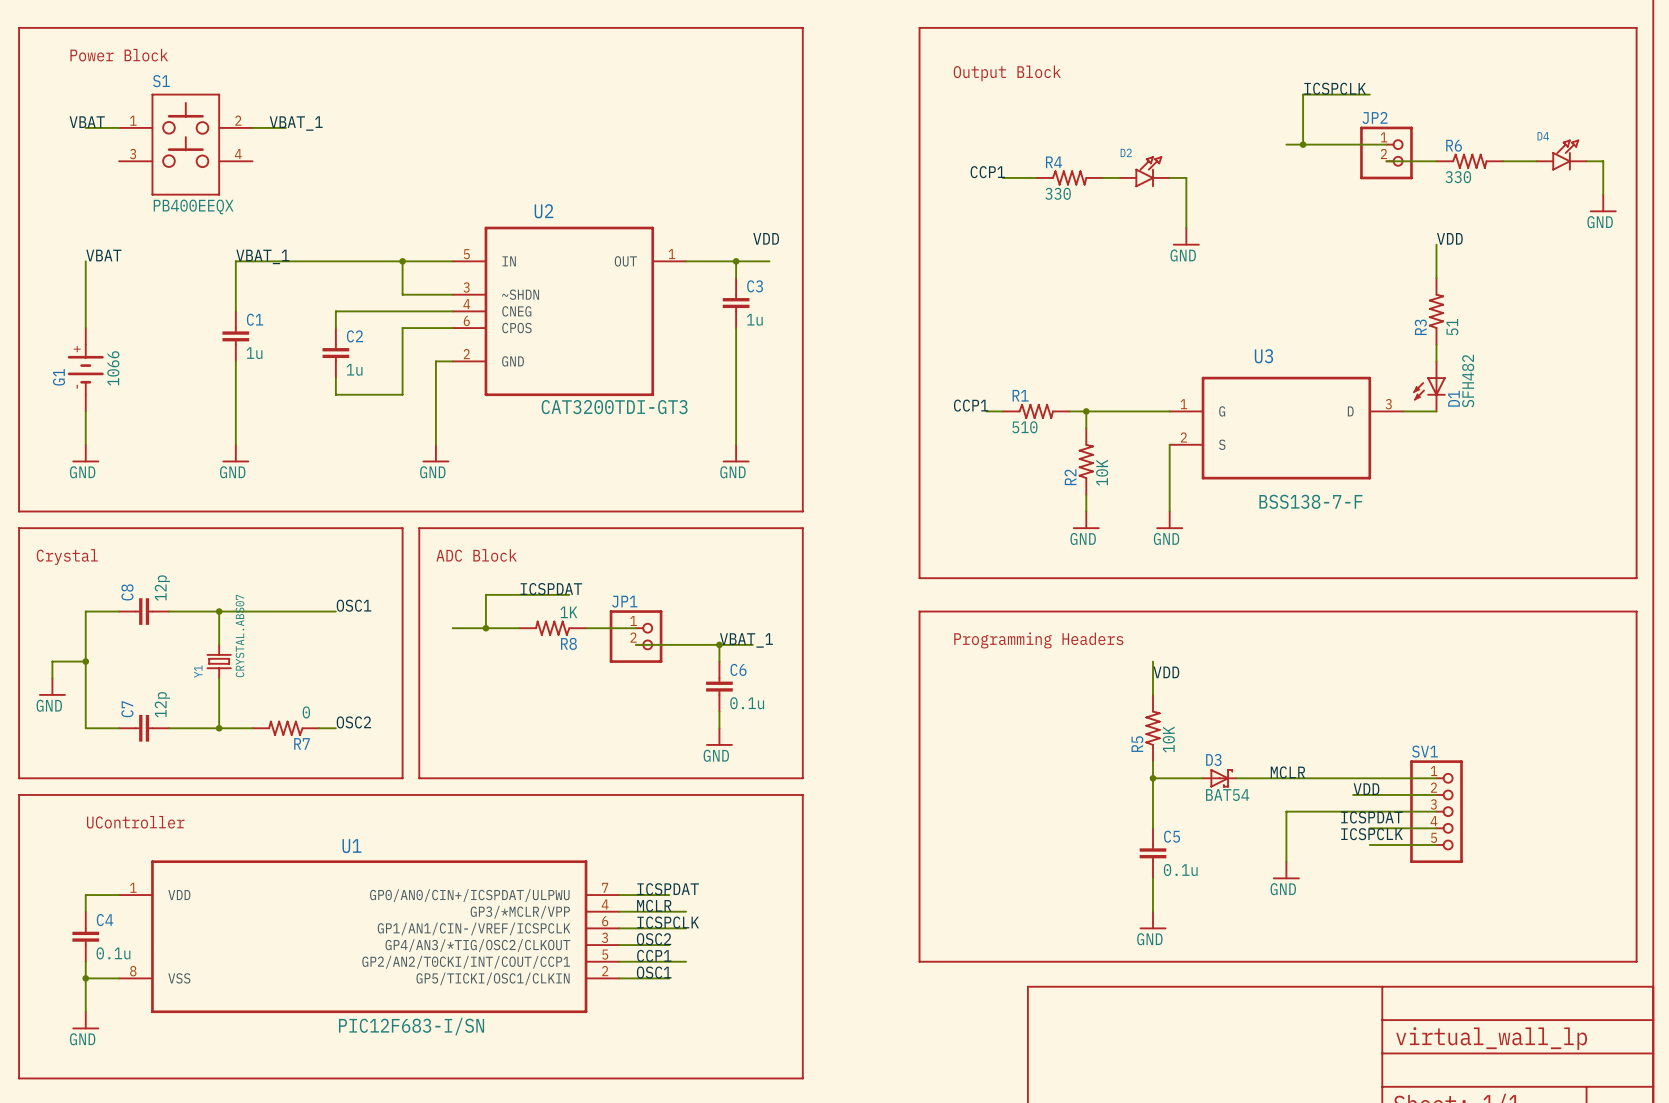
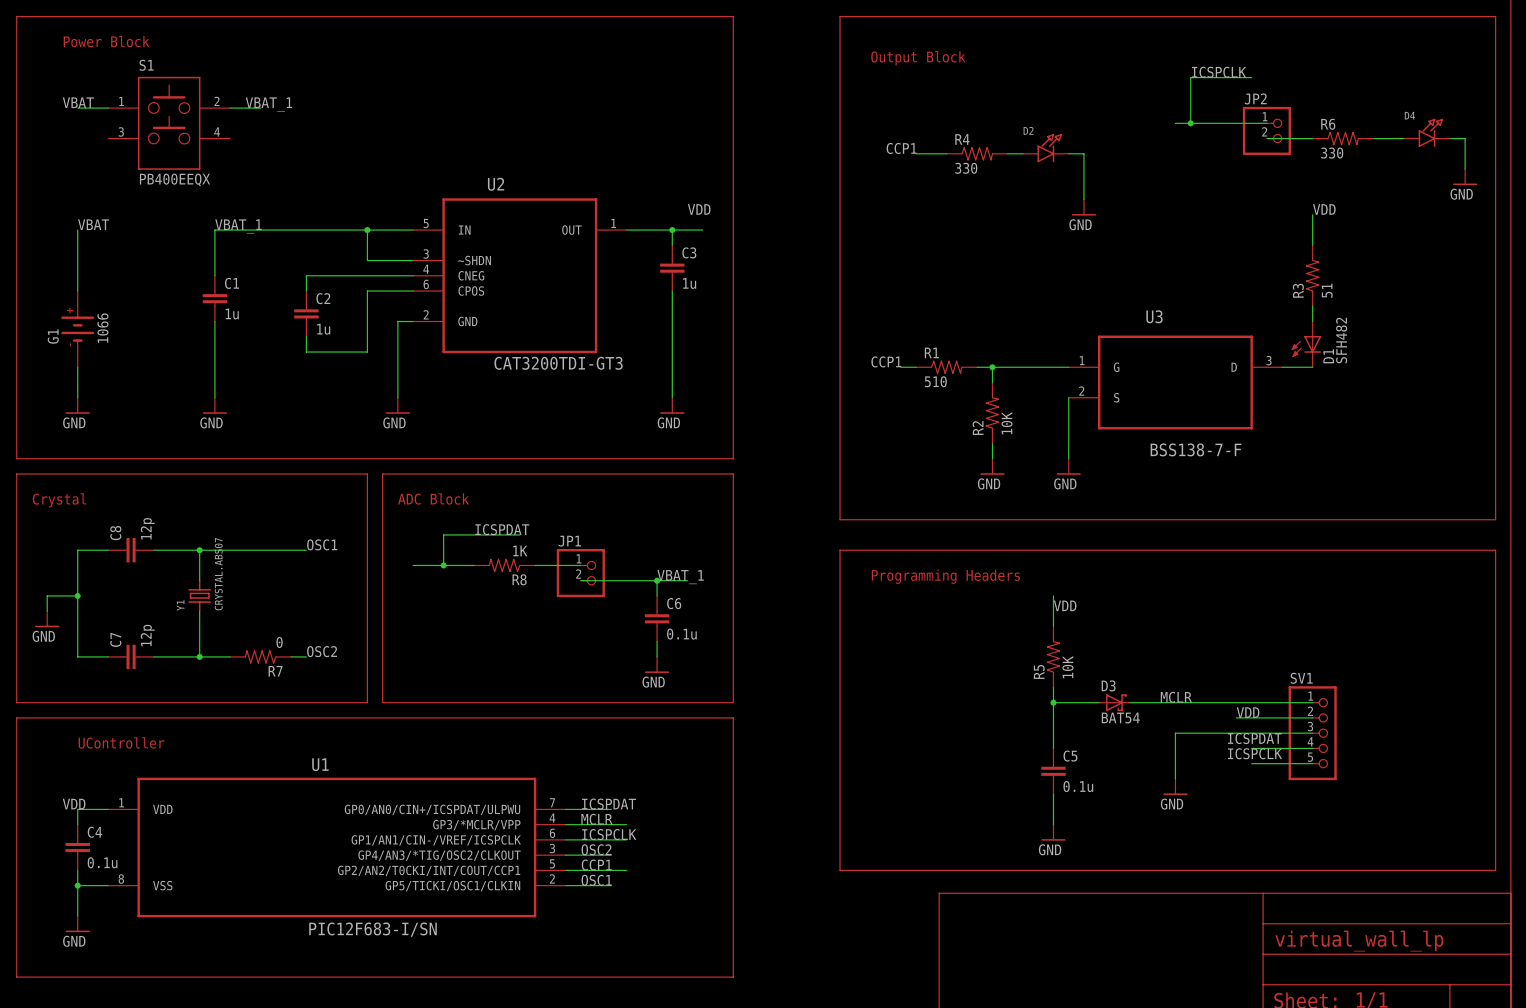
label: none -> VDD (74, 804)

